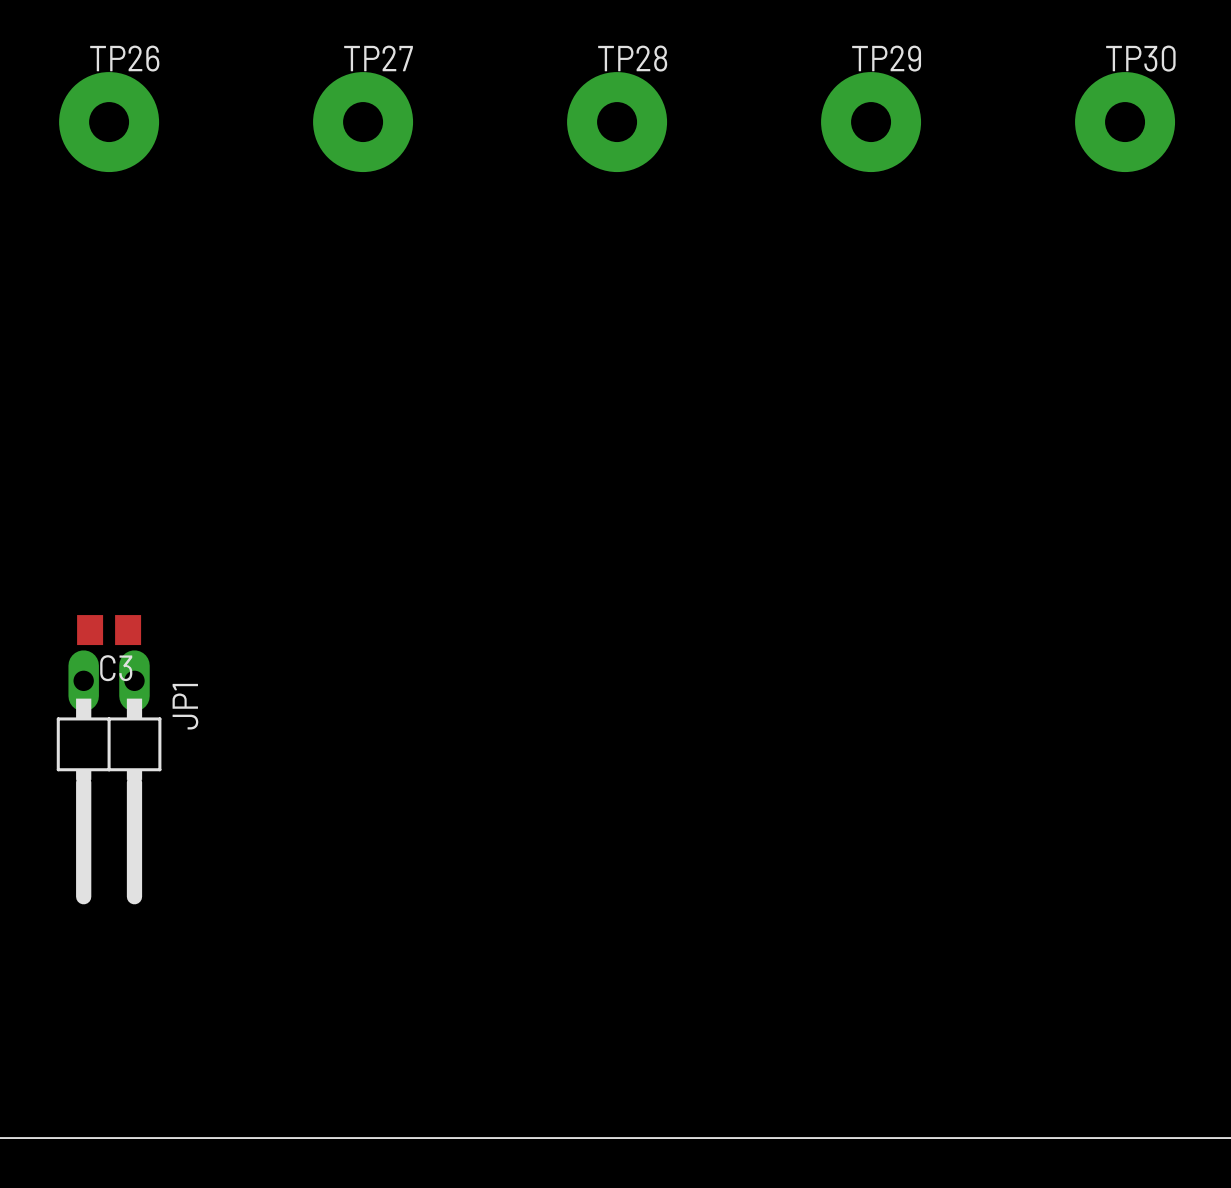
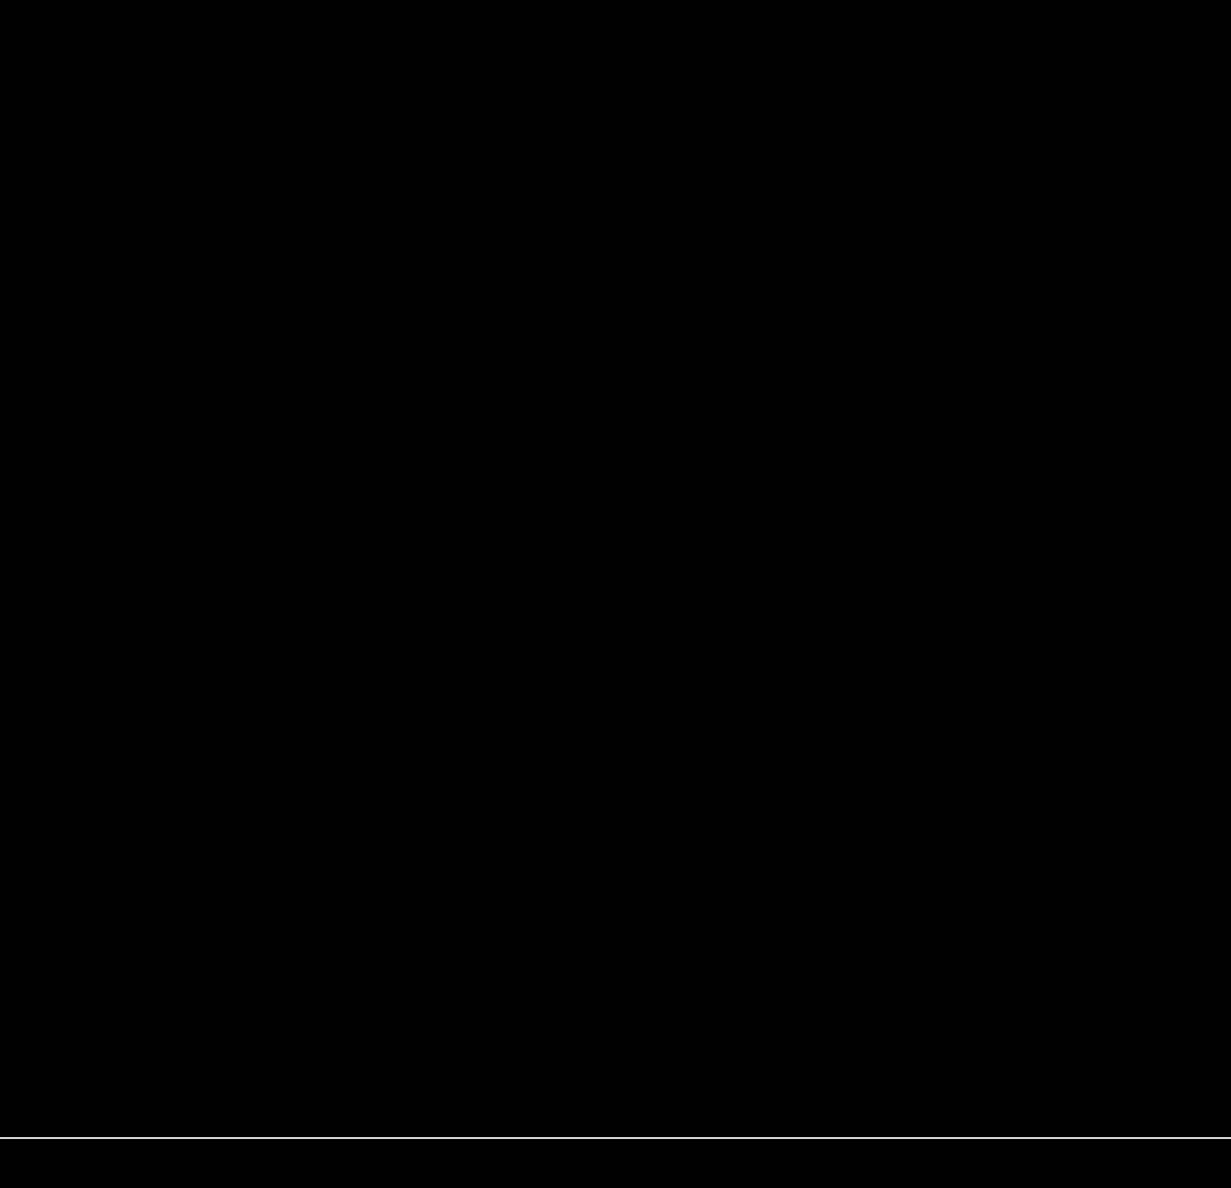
TP26: (109, 122) -> none
TP27: (363, 122) -> none
TP28: (617, 122) -> none
TP29: (871, 122) -> none
TP30: (1125, 122) -> none
C3: (109, 630) -> none
JP1: (109, 777) -> none

